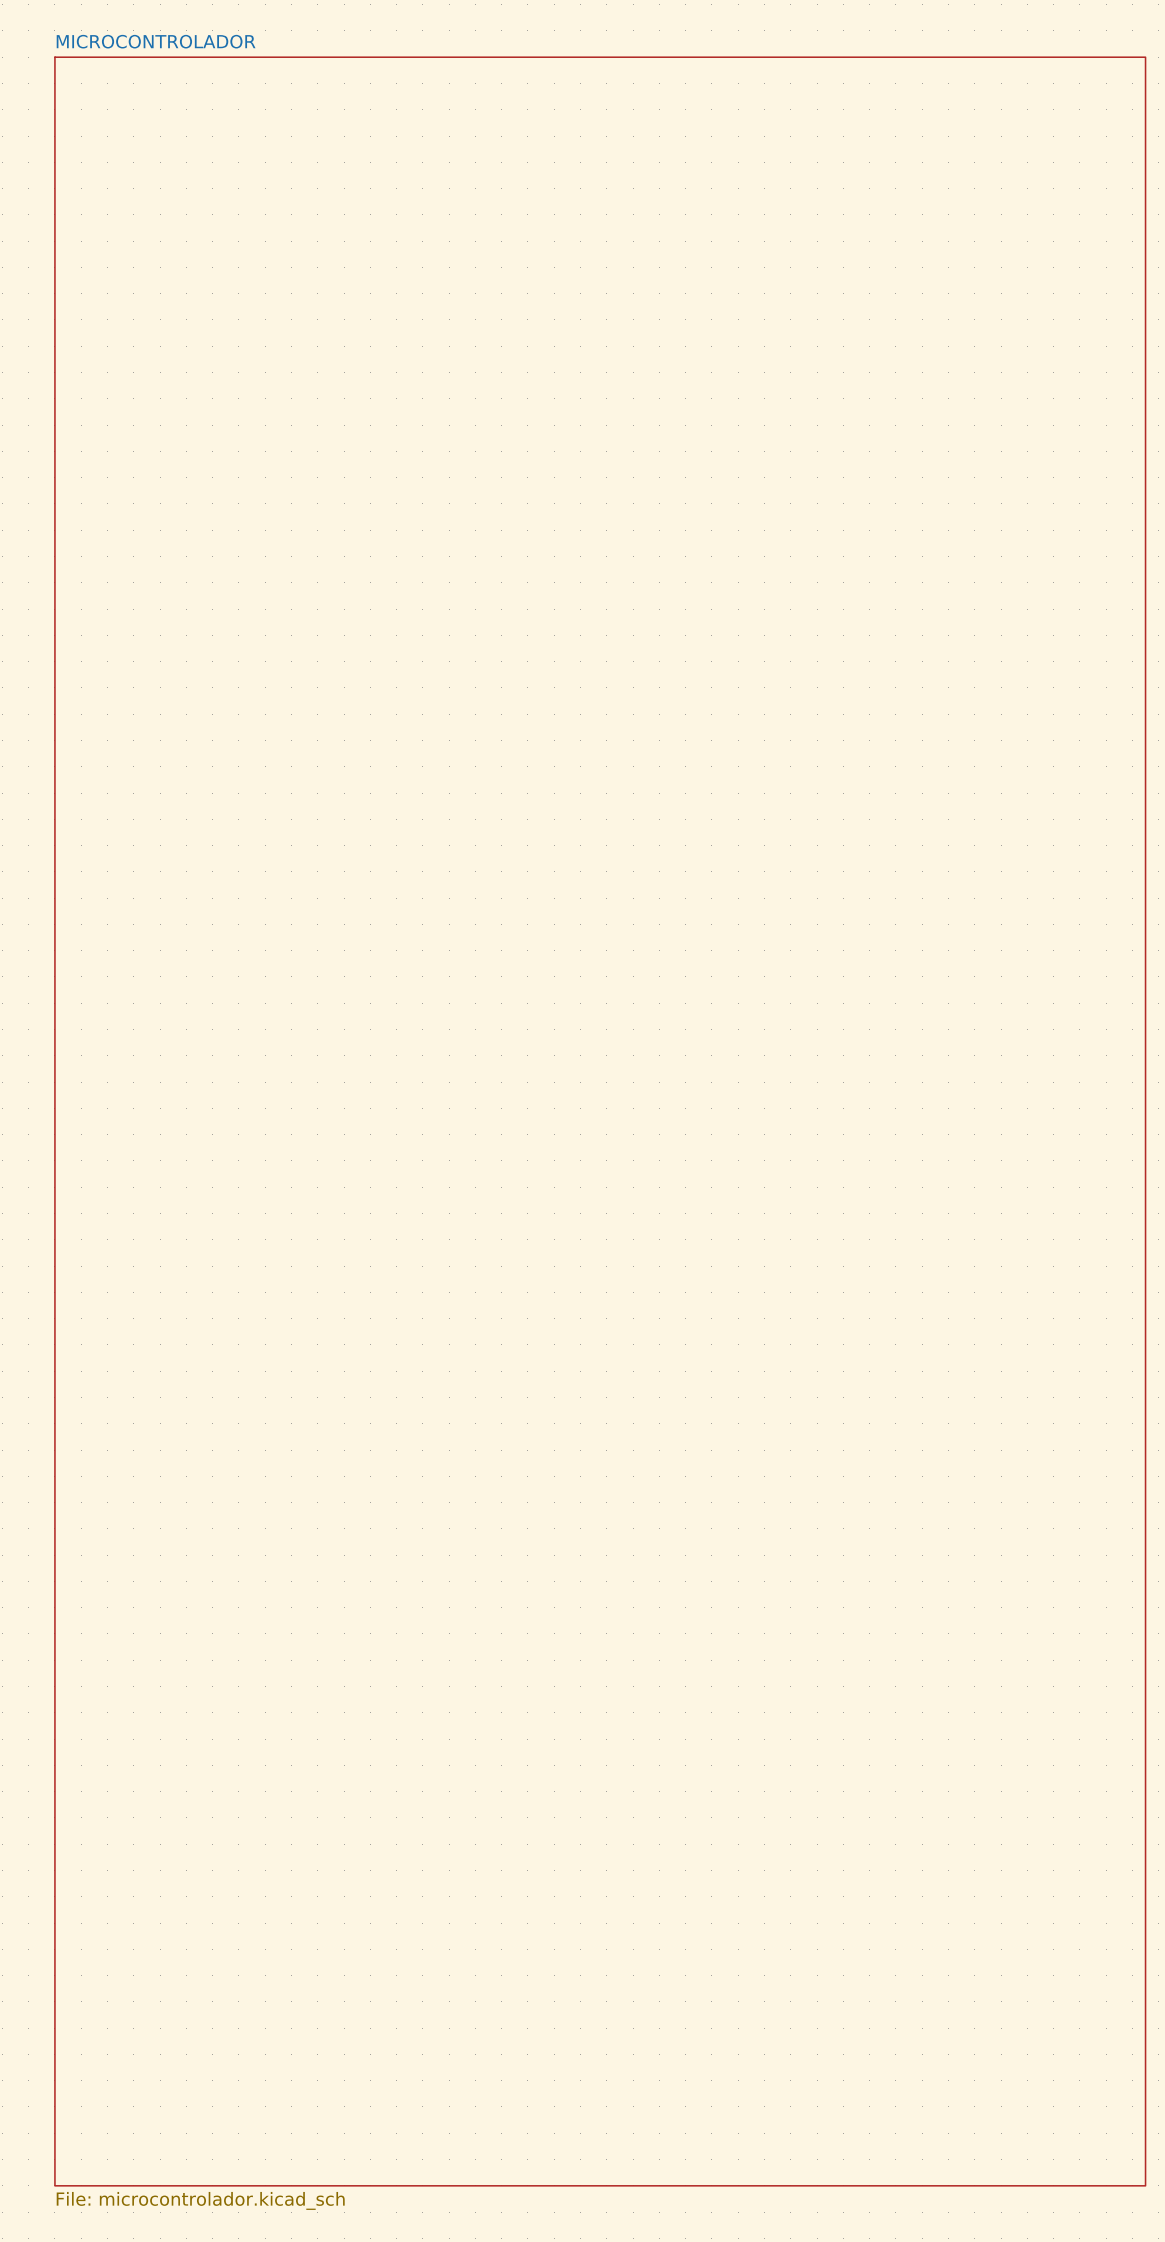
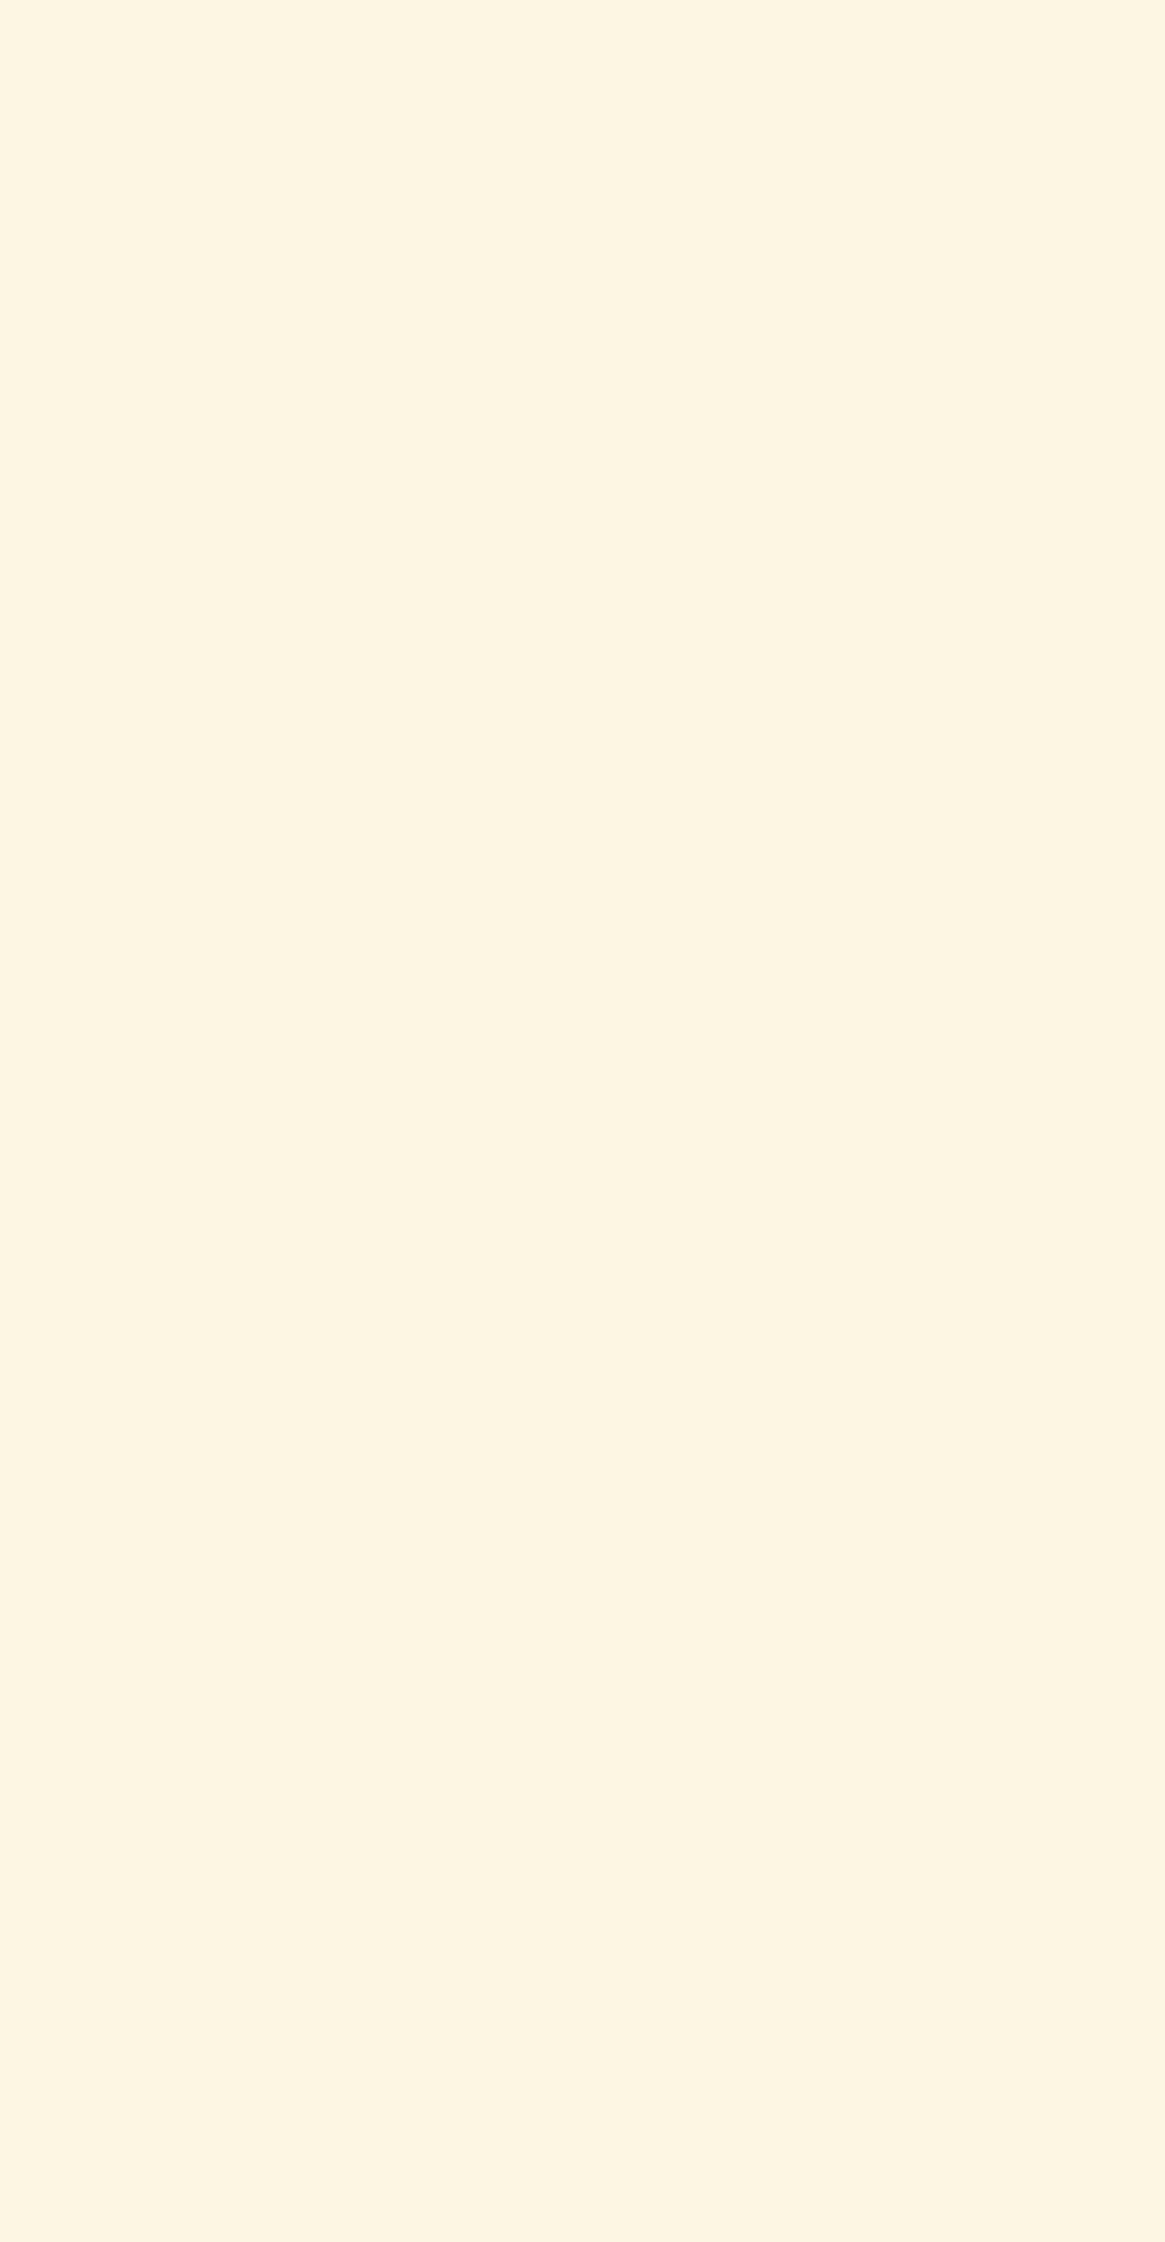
sheet MICROCONTROLADOR: File: microcontrolador.kicad_sch (600, 1121) -> none

